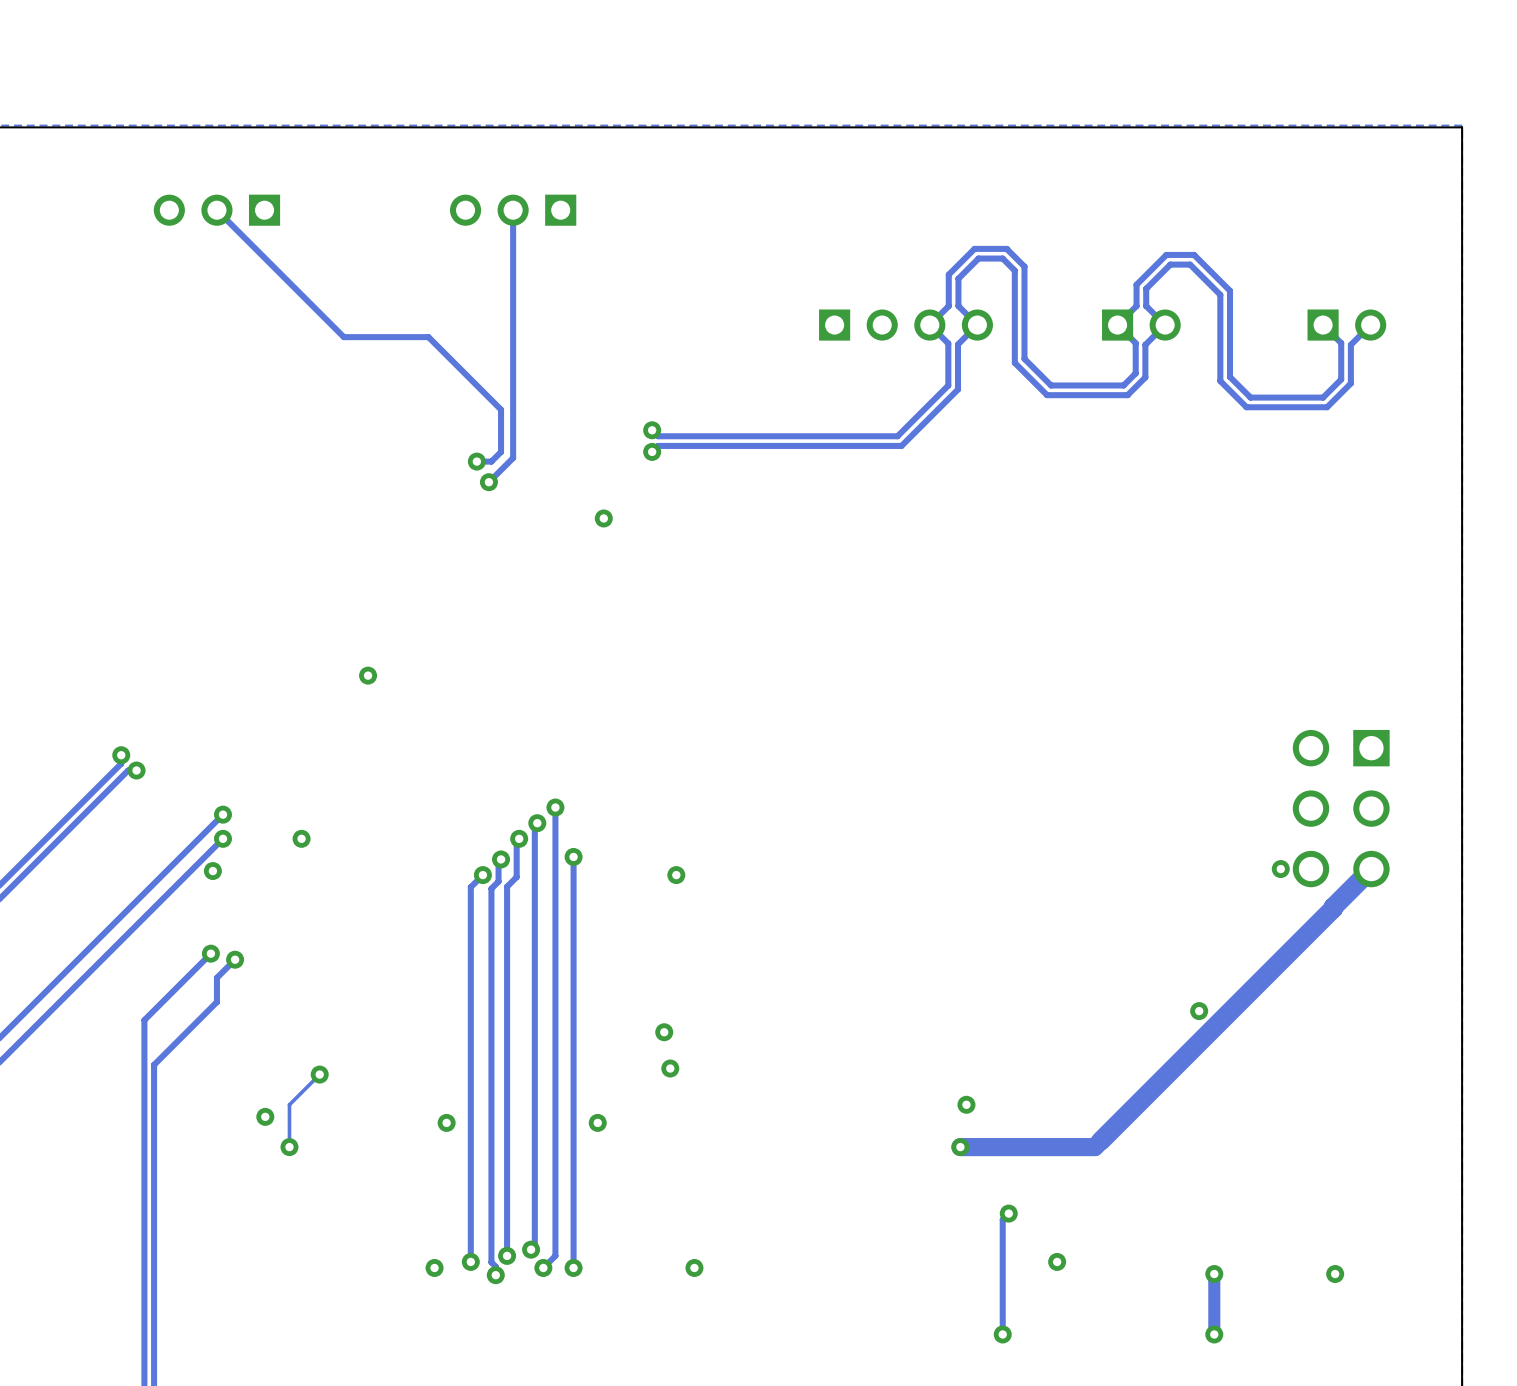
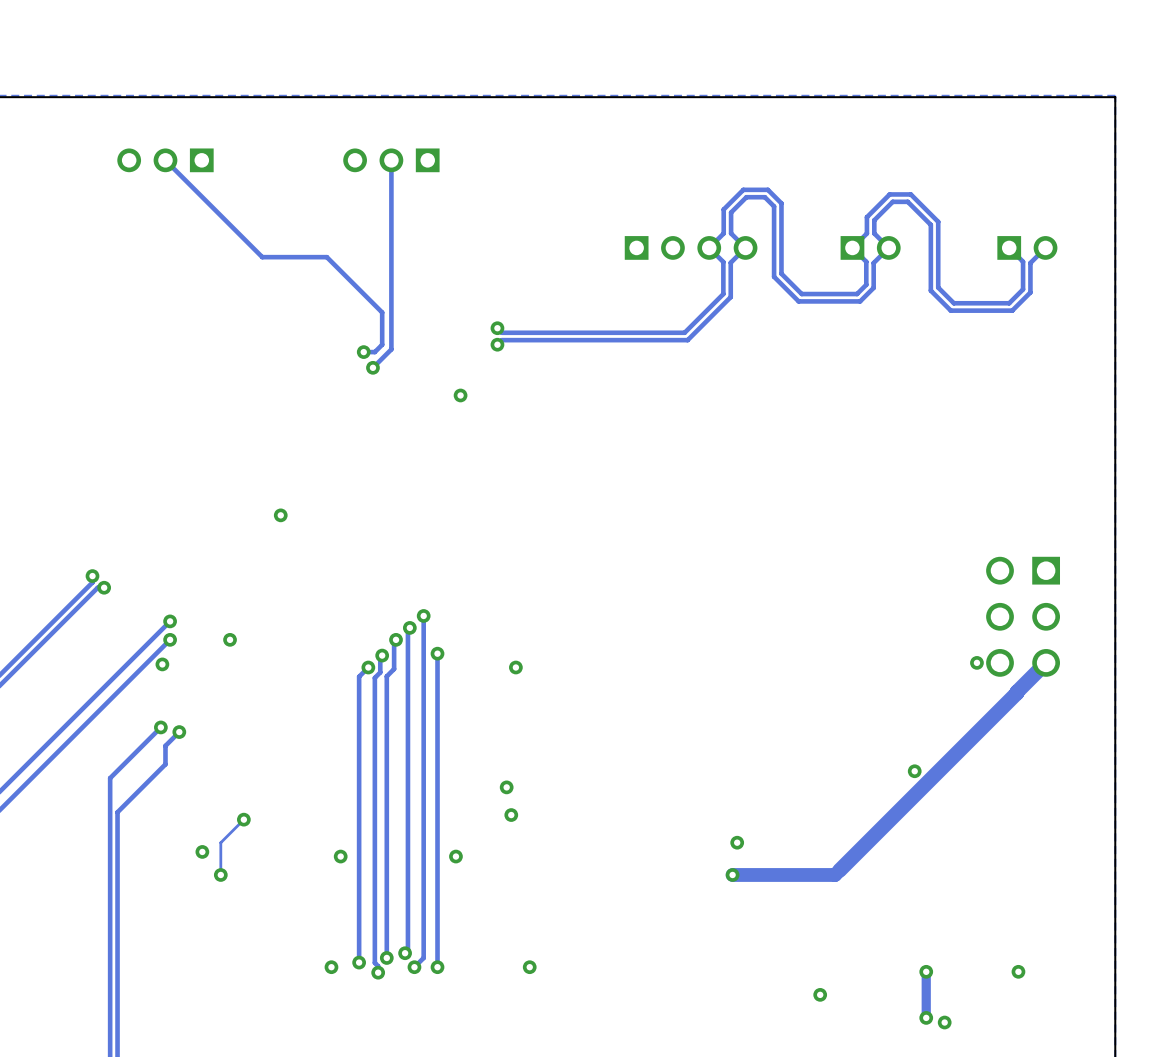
track: (1008, 1213) (1002, 1219) (1002, 1334) -> none
via: (1008, 1213) -> none
via: (1057, 1261) -> none
via: none -> (820, 994)
via: (1002, 1334) -> none
via: none -> (944, 1022)

